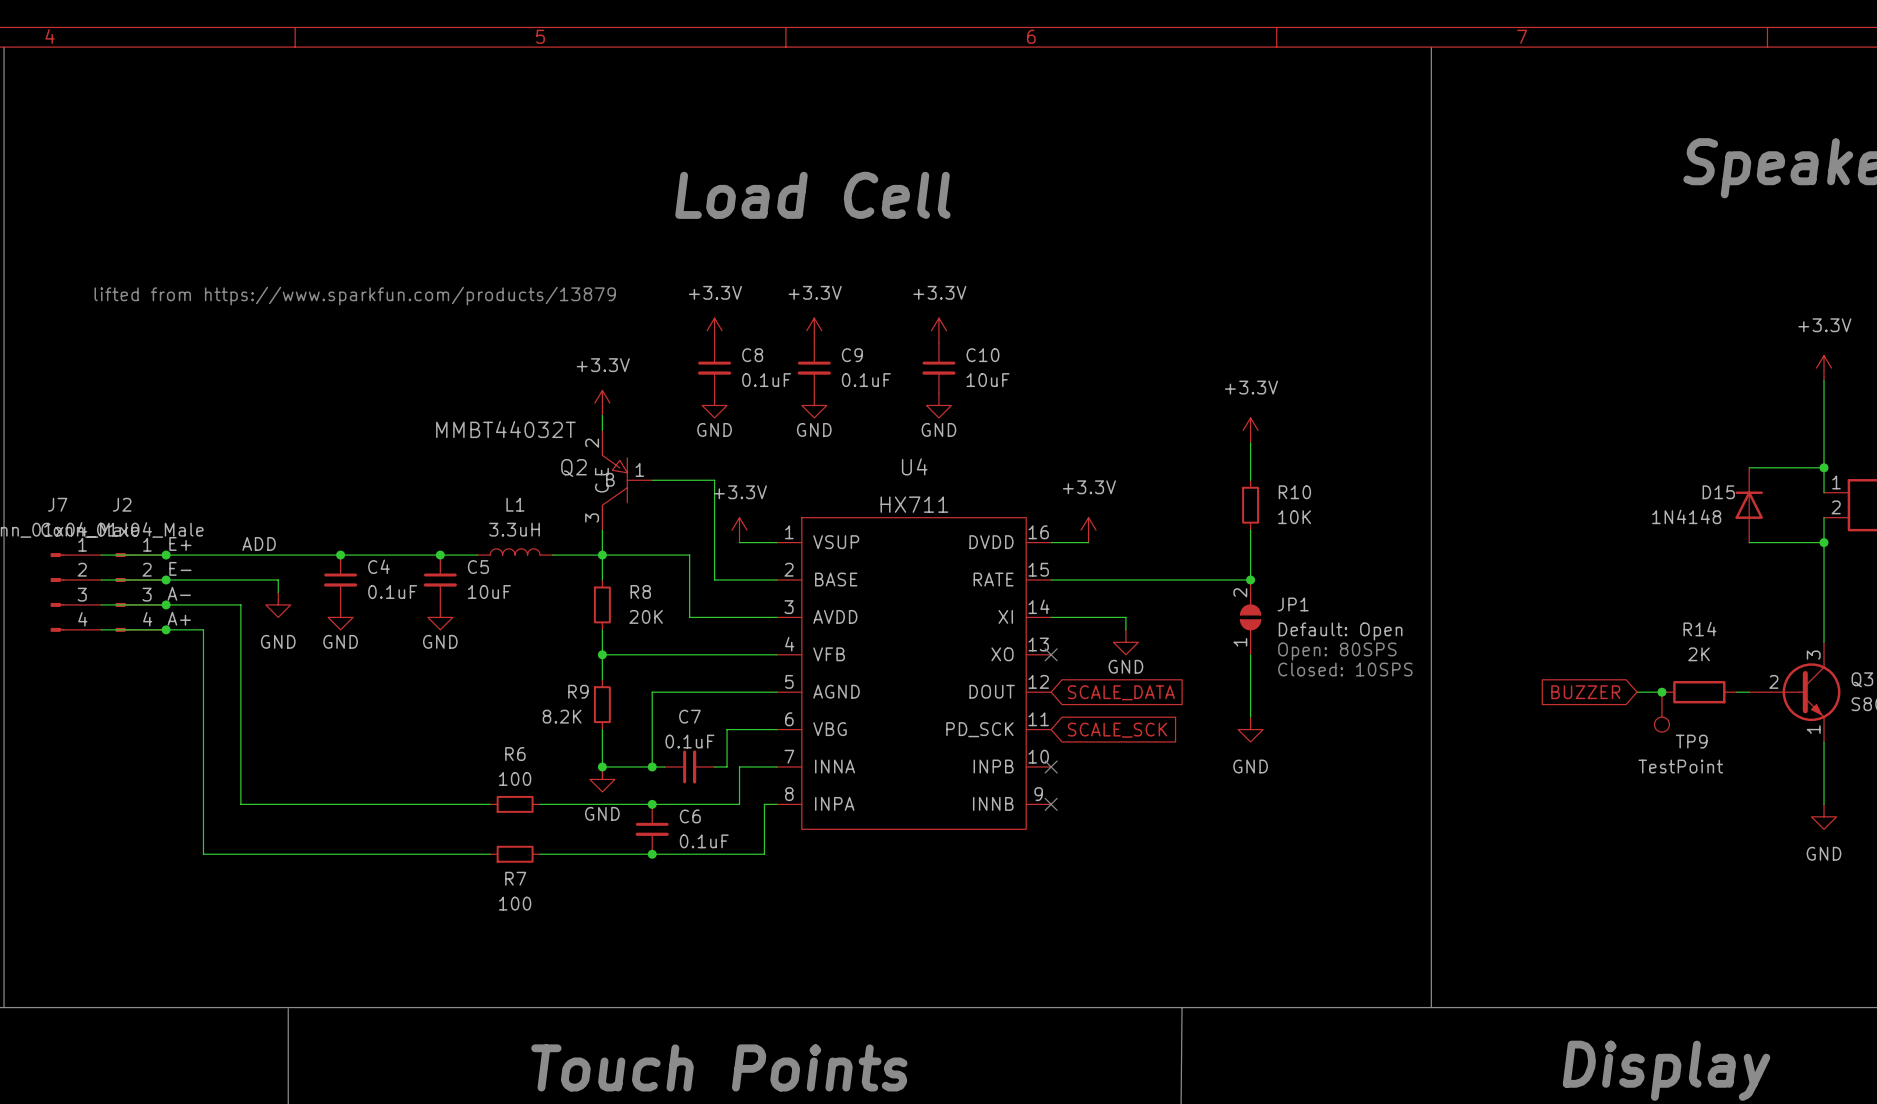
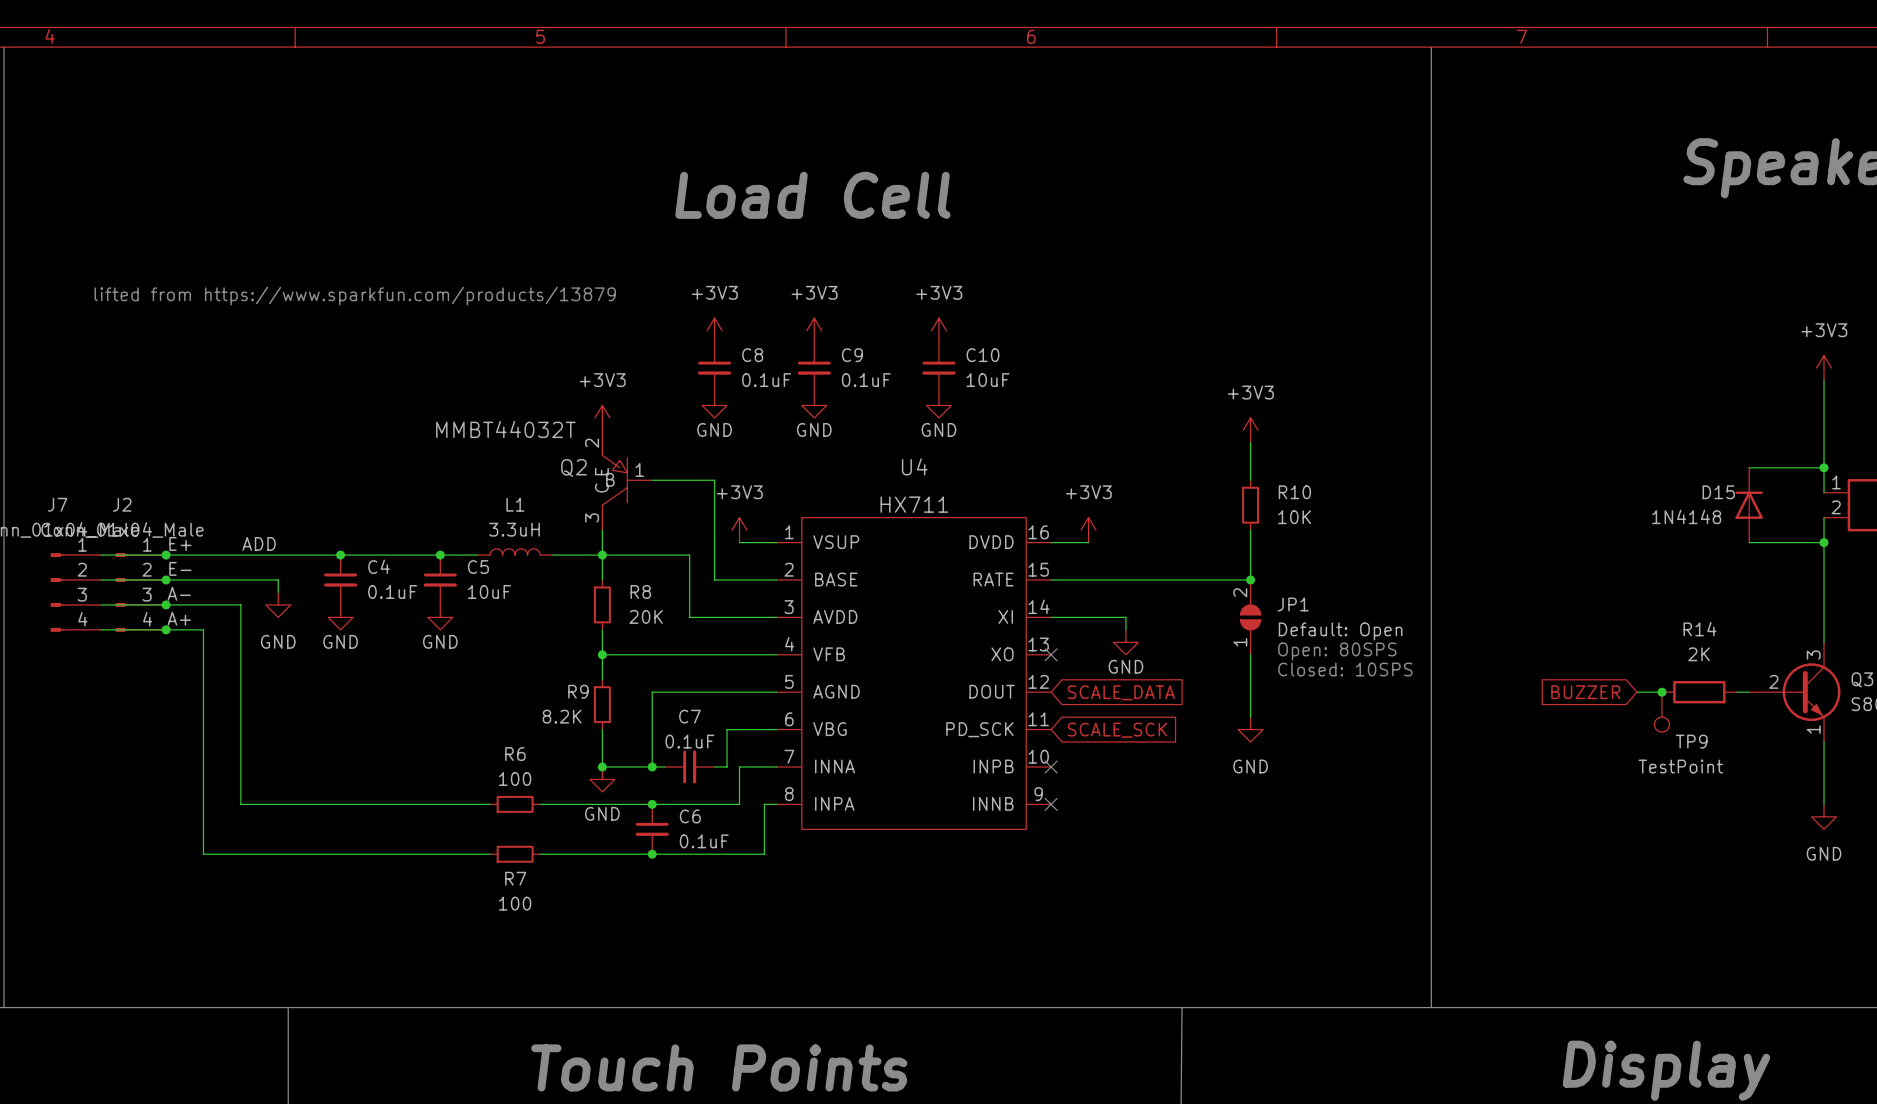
power symbol: +3.3V (714, 330) -> +3V3 (714, 330)
power symbol: +3.3V (814, 330) -> +3V3 (814, 330)
power symbol: +3.3V (938, 330) -> +3V3 (938, 330)
power symbol: +3.3V (1824, 368) -> +3V3 (1824, 368)
power symbol: +3.3V (602, 402) -> none
power symbol: none -> +3V3 (602, 417)
power symbol: +3.3V (1250, 430) -> +3V3 (1250, 430)
power symbol: +3.3V (739, 530) -> +3V3 (739, 530)
power symbol: +3.3V (1088, 530) -> +3V3 (1088, 530)

